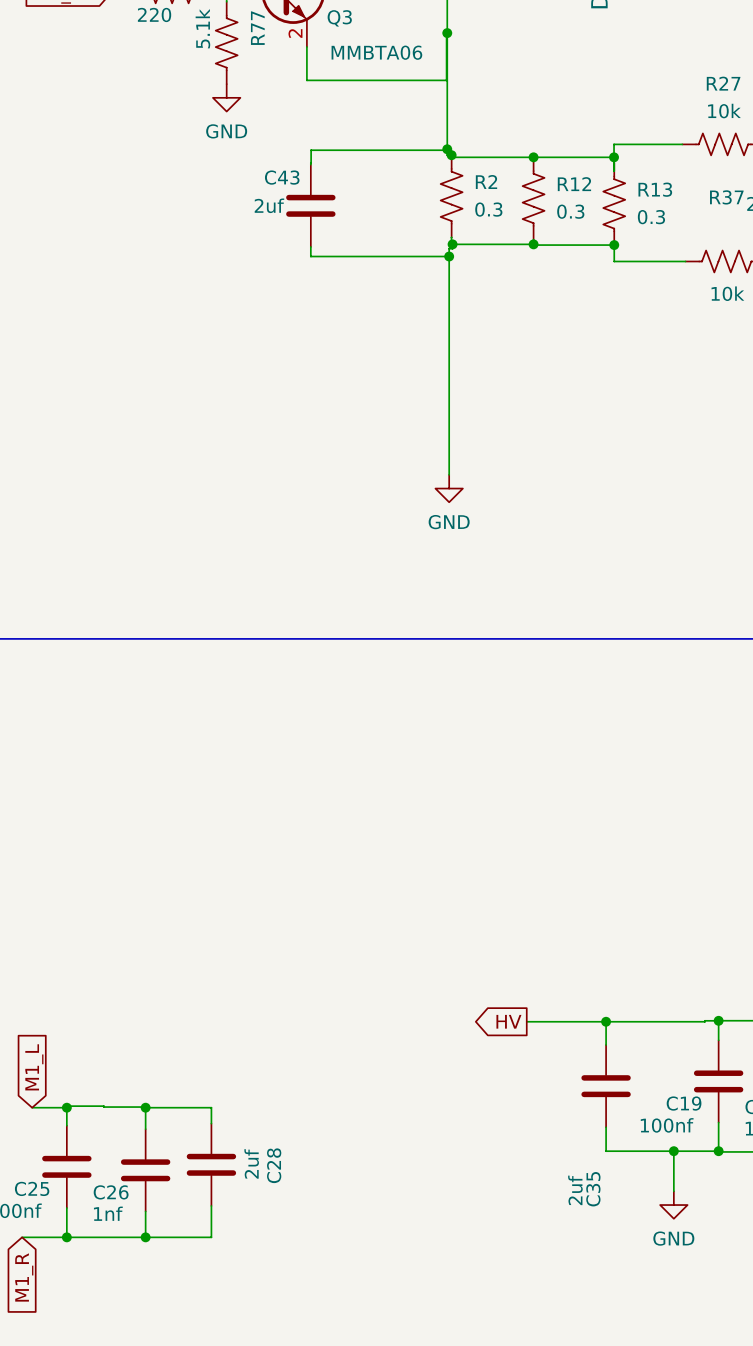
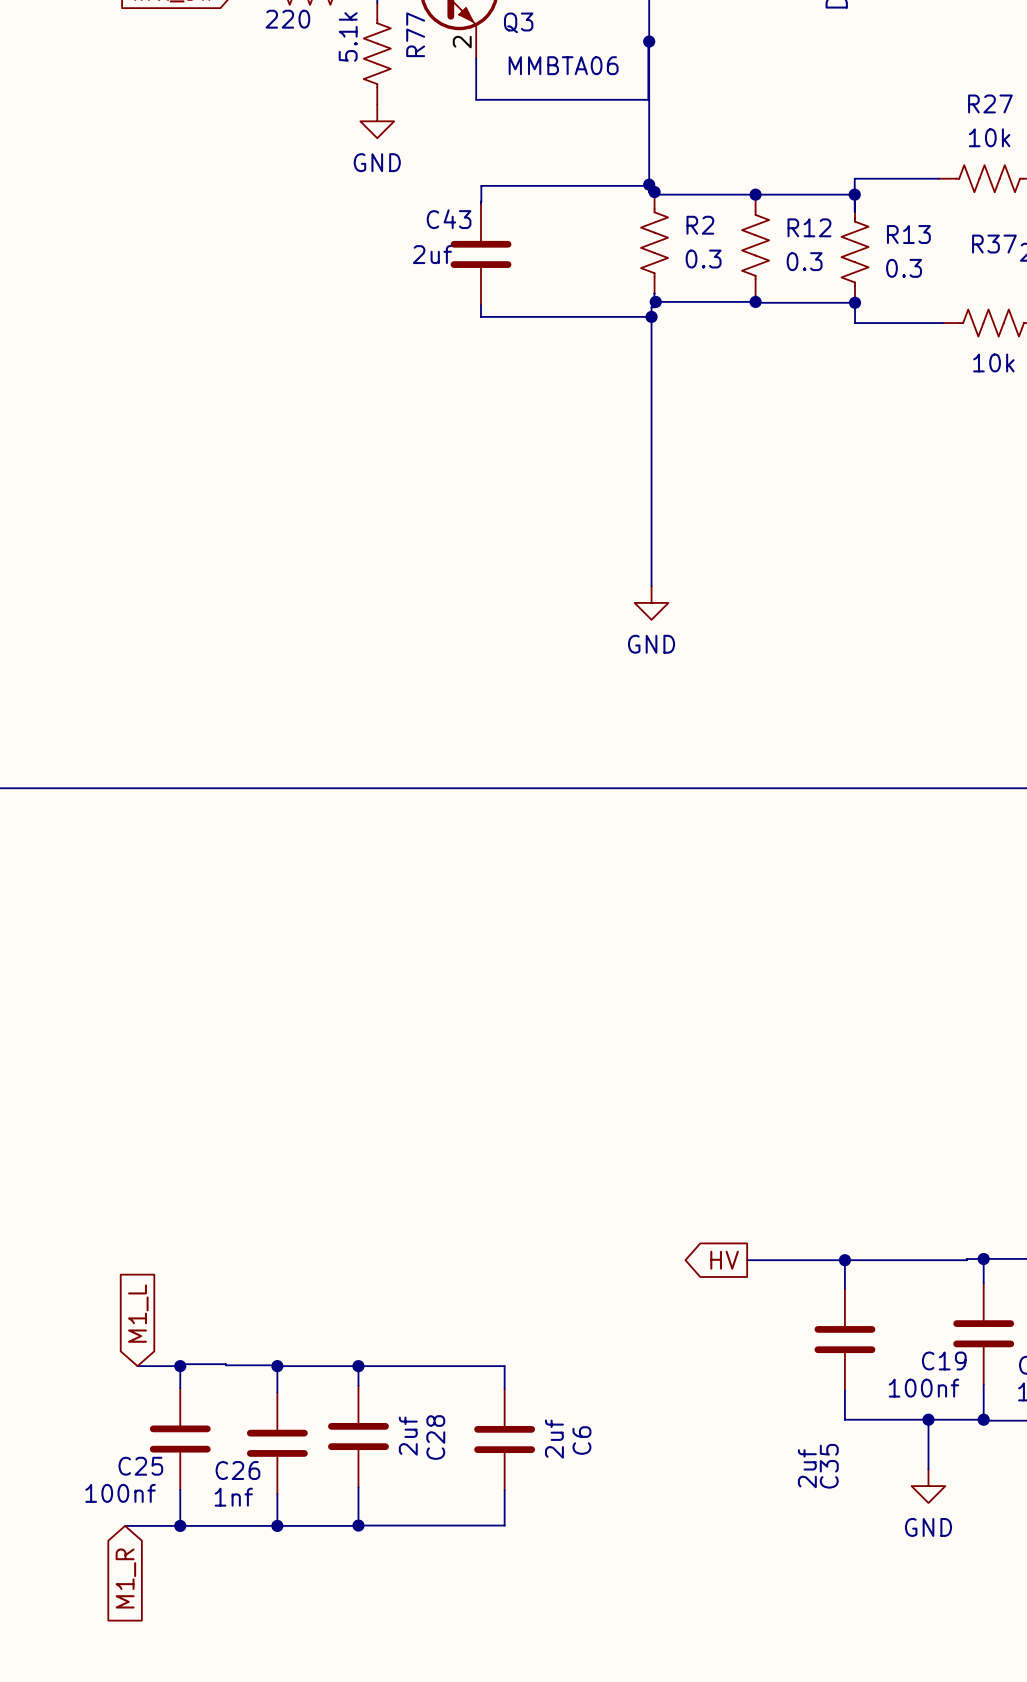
wire: none -> (358, 1366) (504, 1366) (504, 1388)
junction: none -> (358, 1366)
C6: none -> 2uf (504, 1439)
wire: none -> (504, 1490) (504, 1525) (358, 1525)
junction: none -> (358, 1525)

